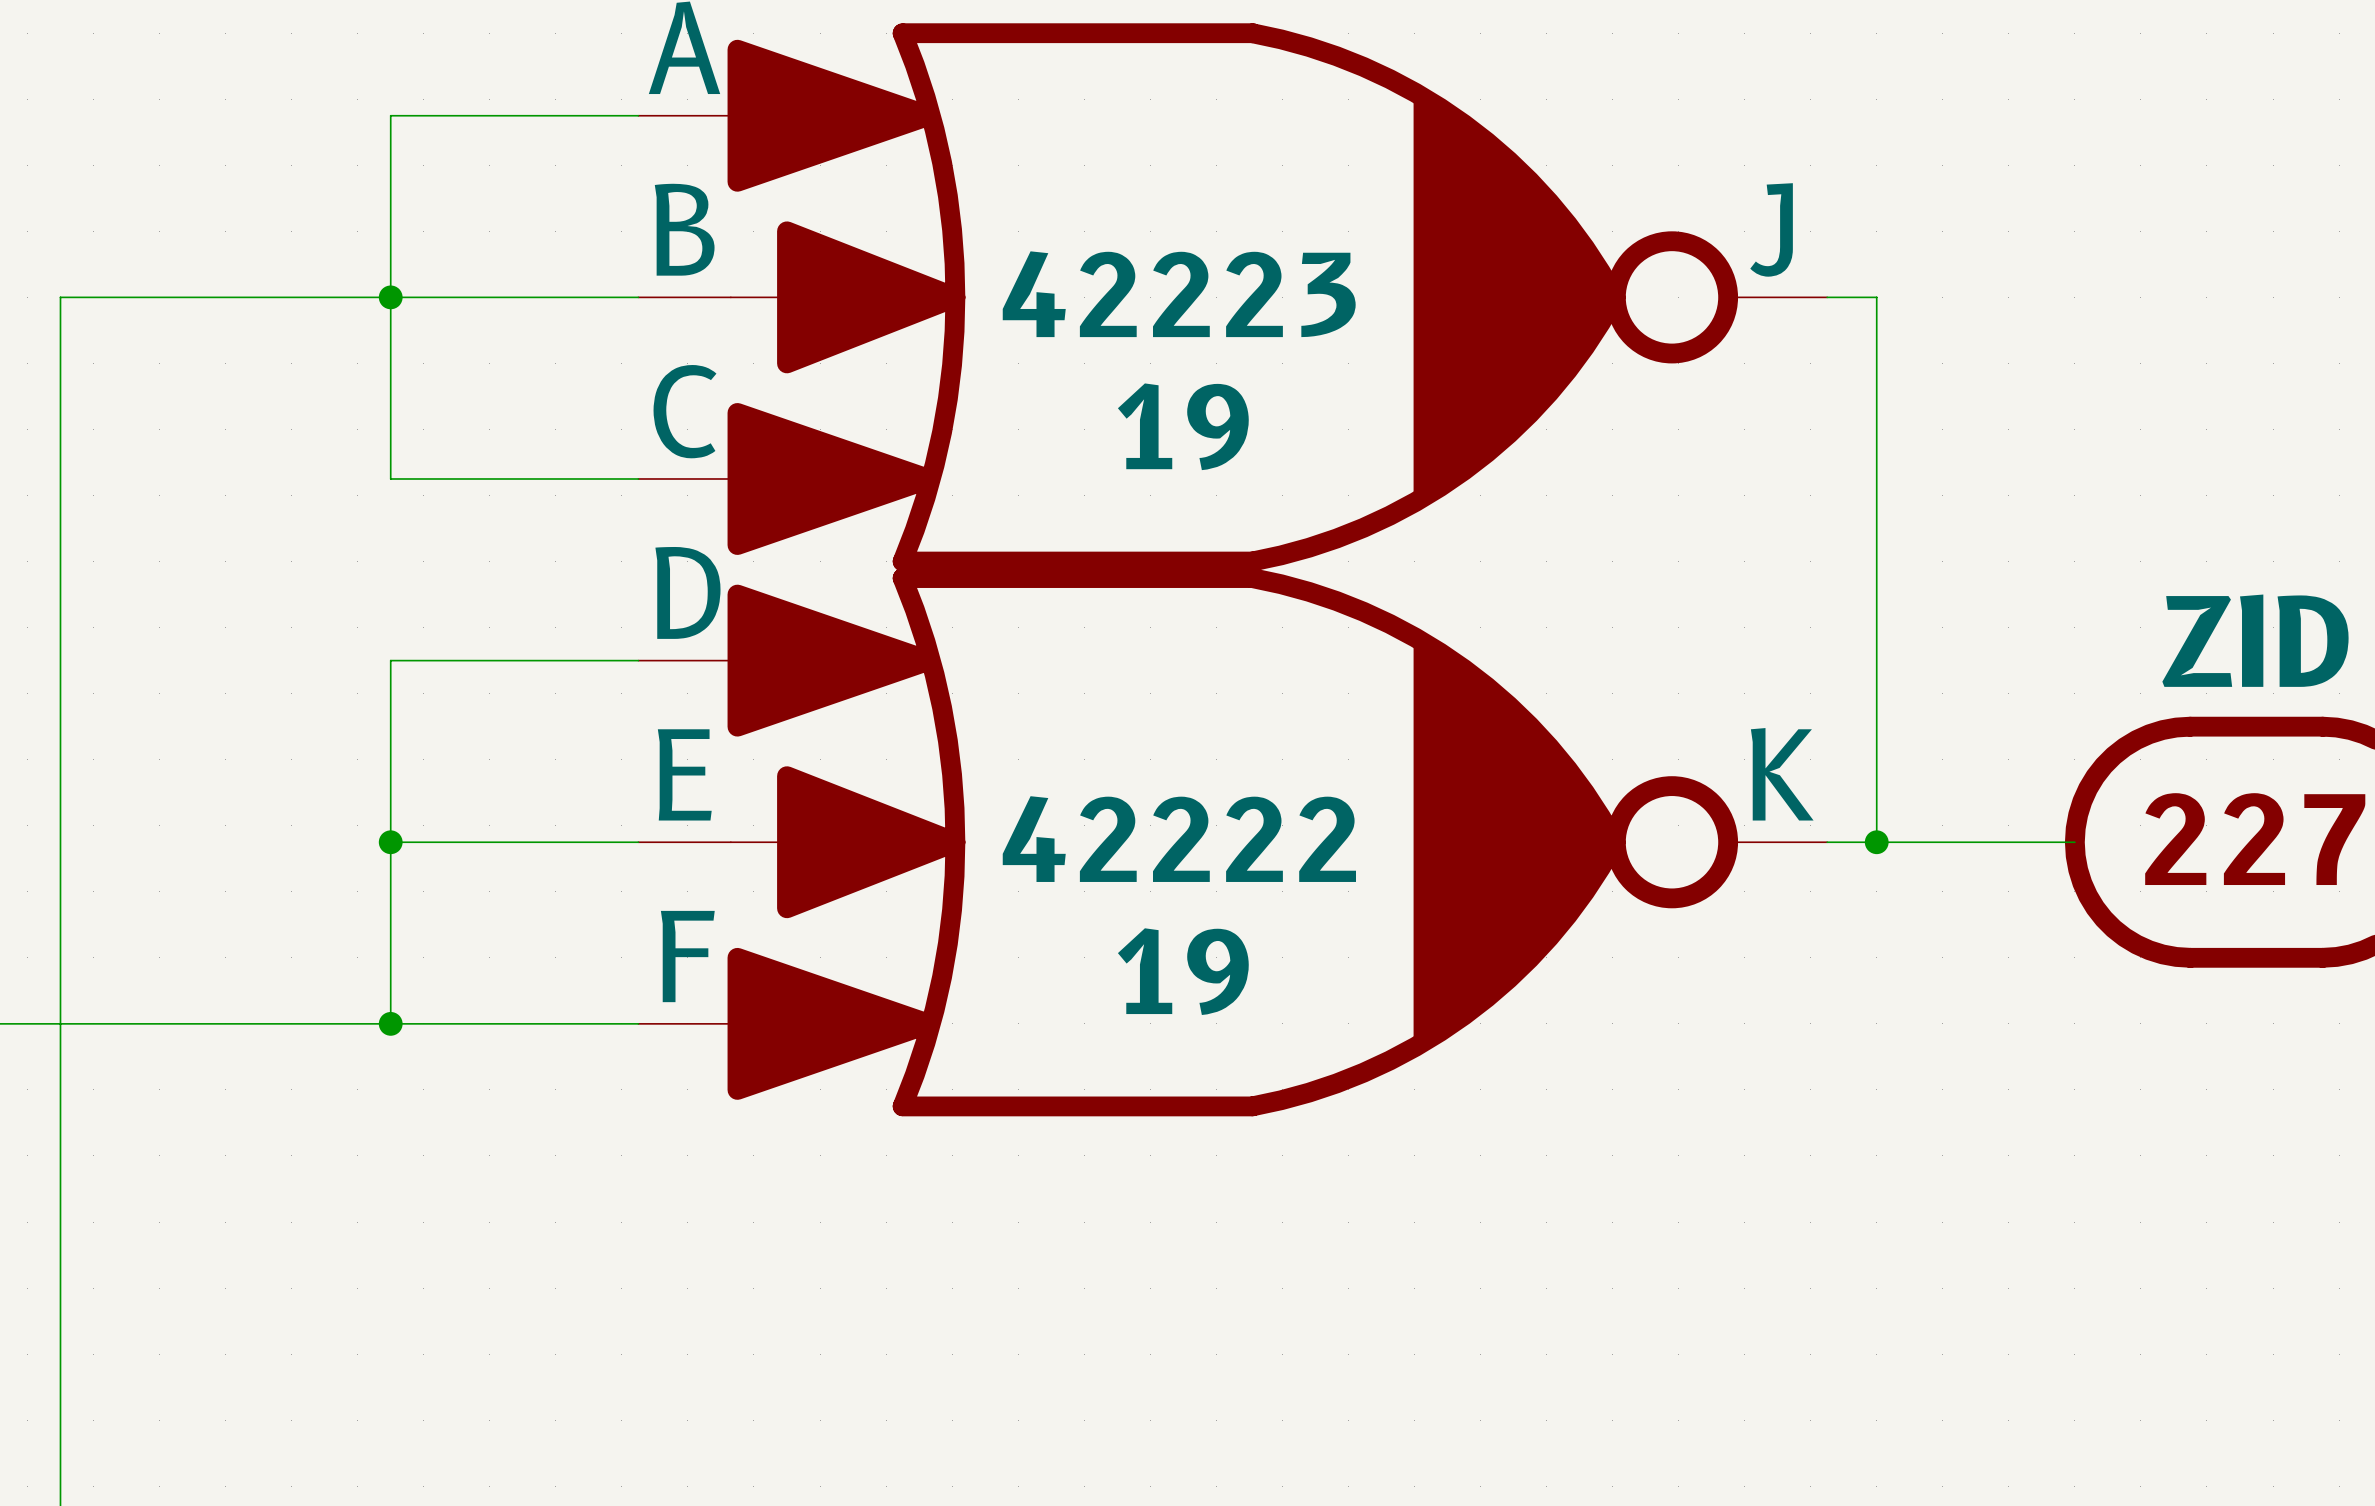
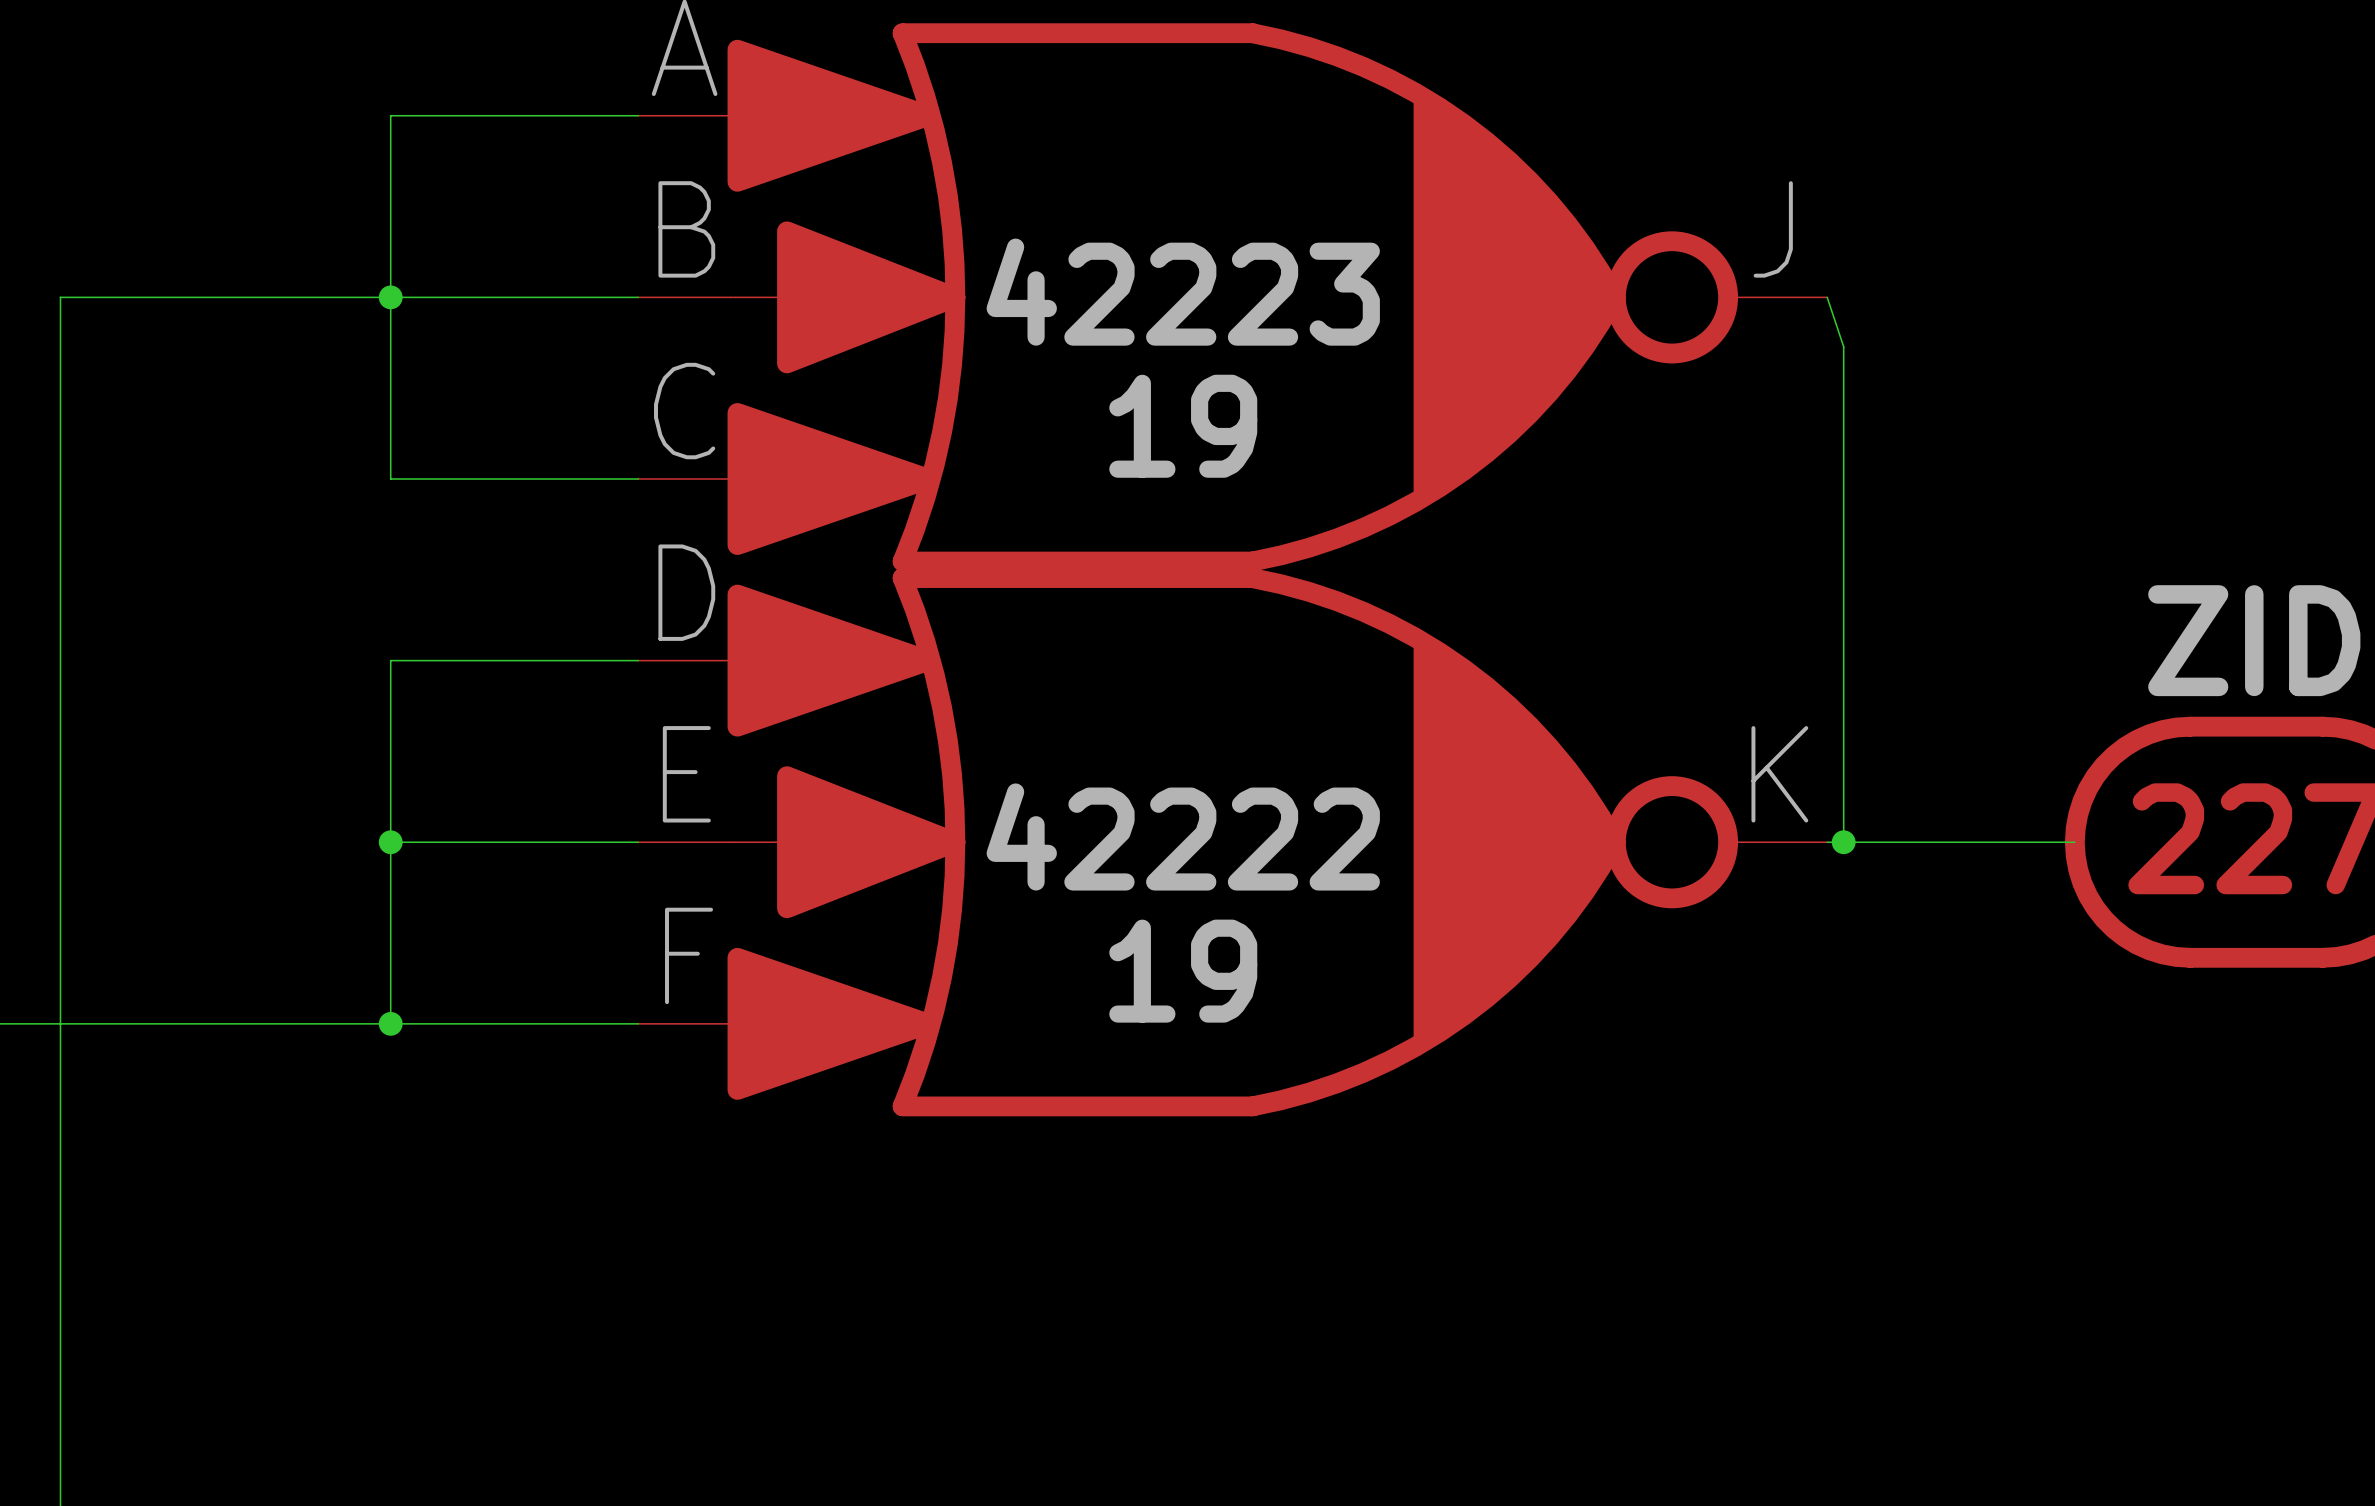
wire: (1827, 297) (1876, 297) (1876, 842) -> (1827, 297) (1843, 346) (1843, 842)
junction position: (1876, 842) -> (1843, 842)

